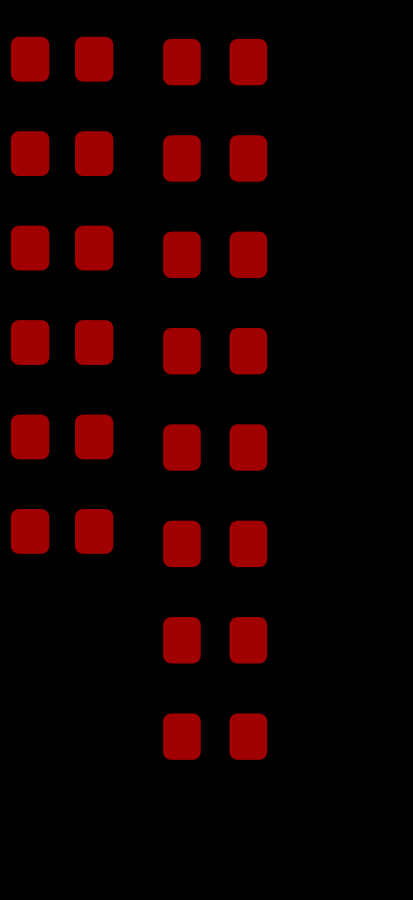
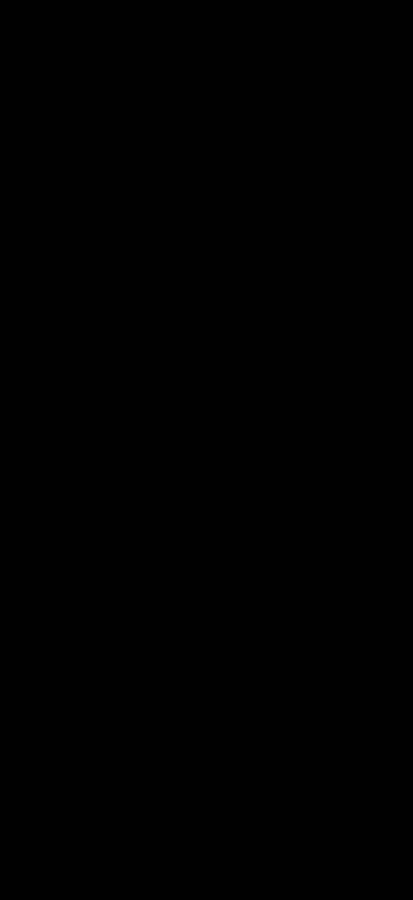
part: (62, 59) -> none
part: (215, 62) -> none
part: (62, 153) -> none
part: (215, 158) -> none
part: (62, 248) -> none
part: (215, 254) -> none
part: (62, 342) -> none
part: (215, 351) -> none
part: (62, 436) -> none
part: (215, 447) -> none
part: (62, 531) -> none
part: (215, 543) -> none
part: (215, 640) -> none
part: (215, 736) -> none

